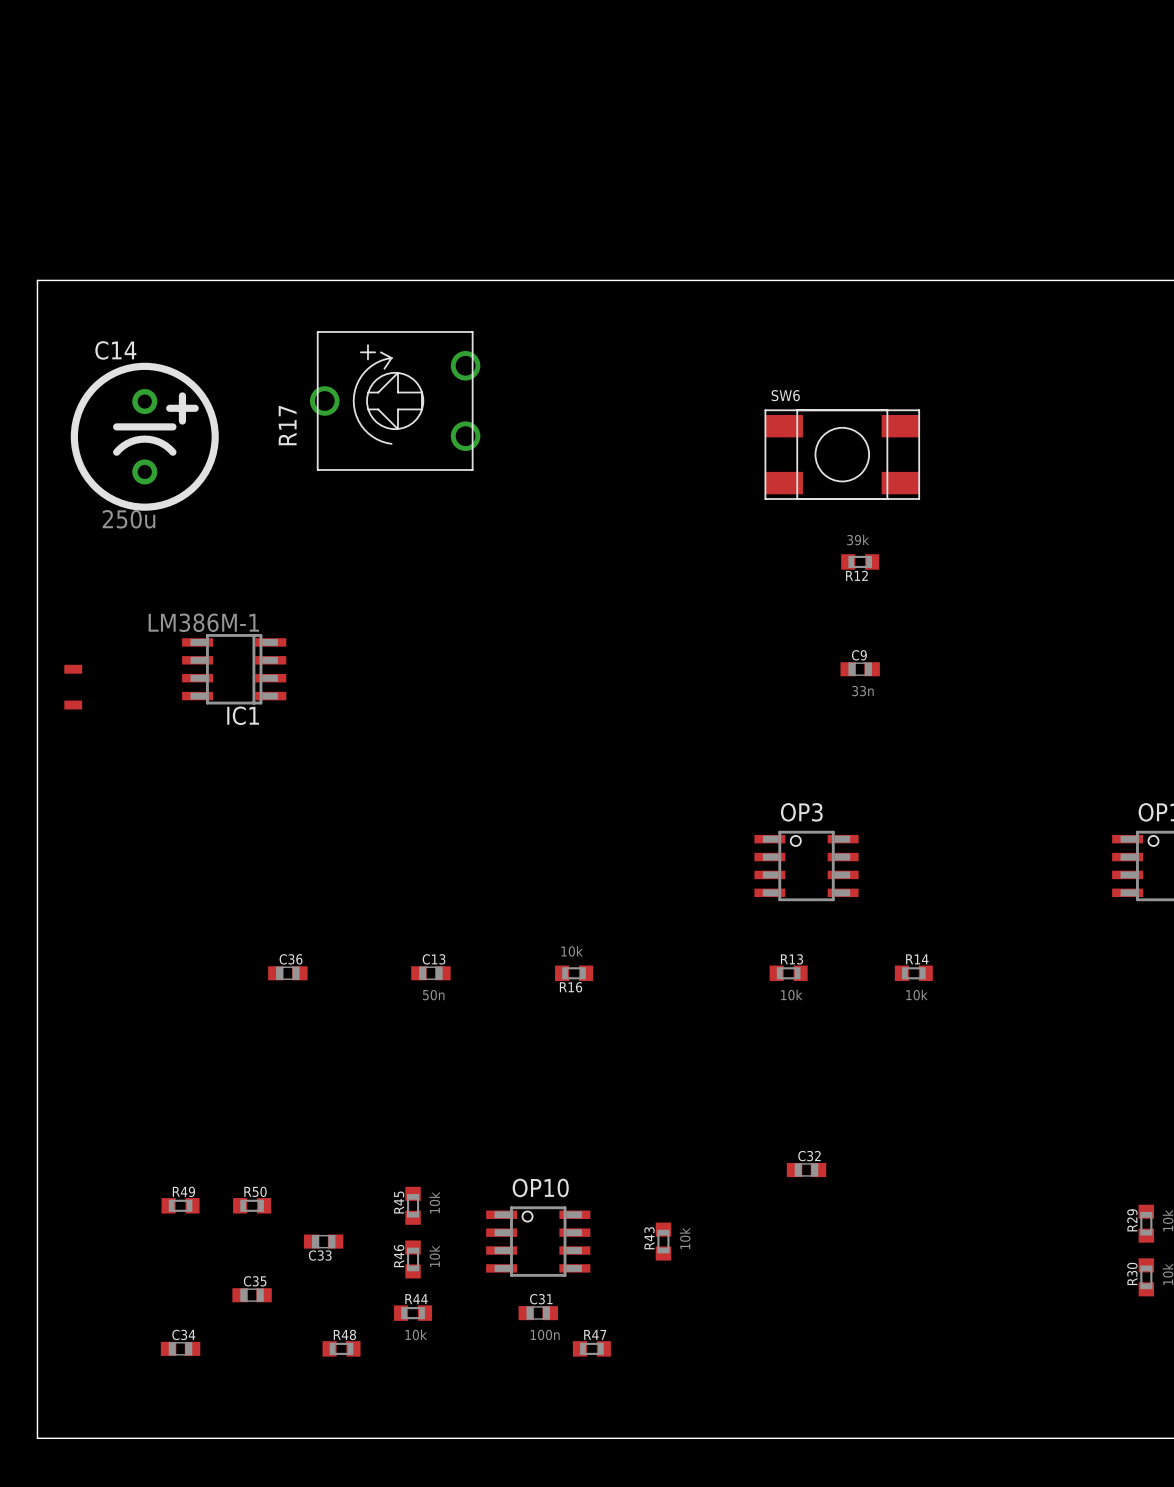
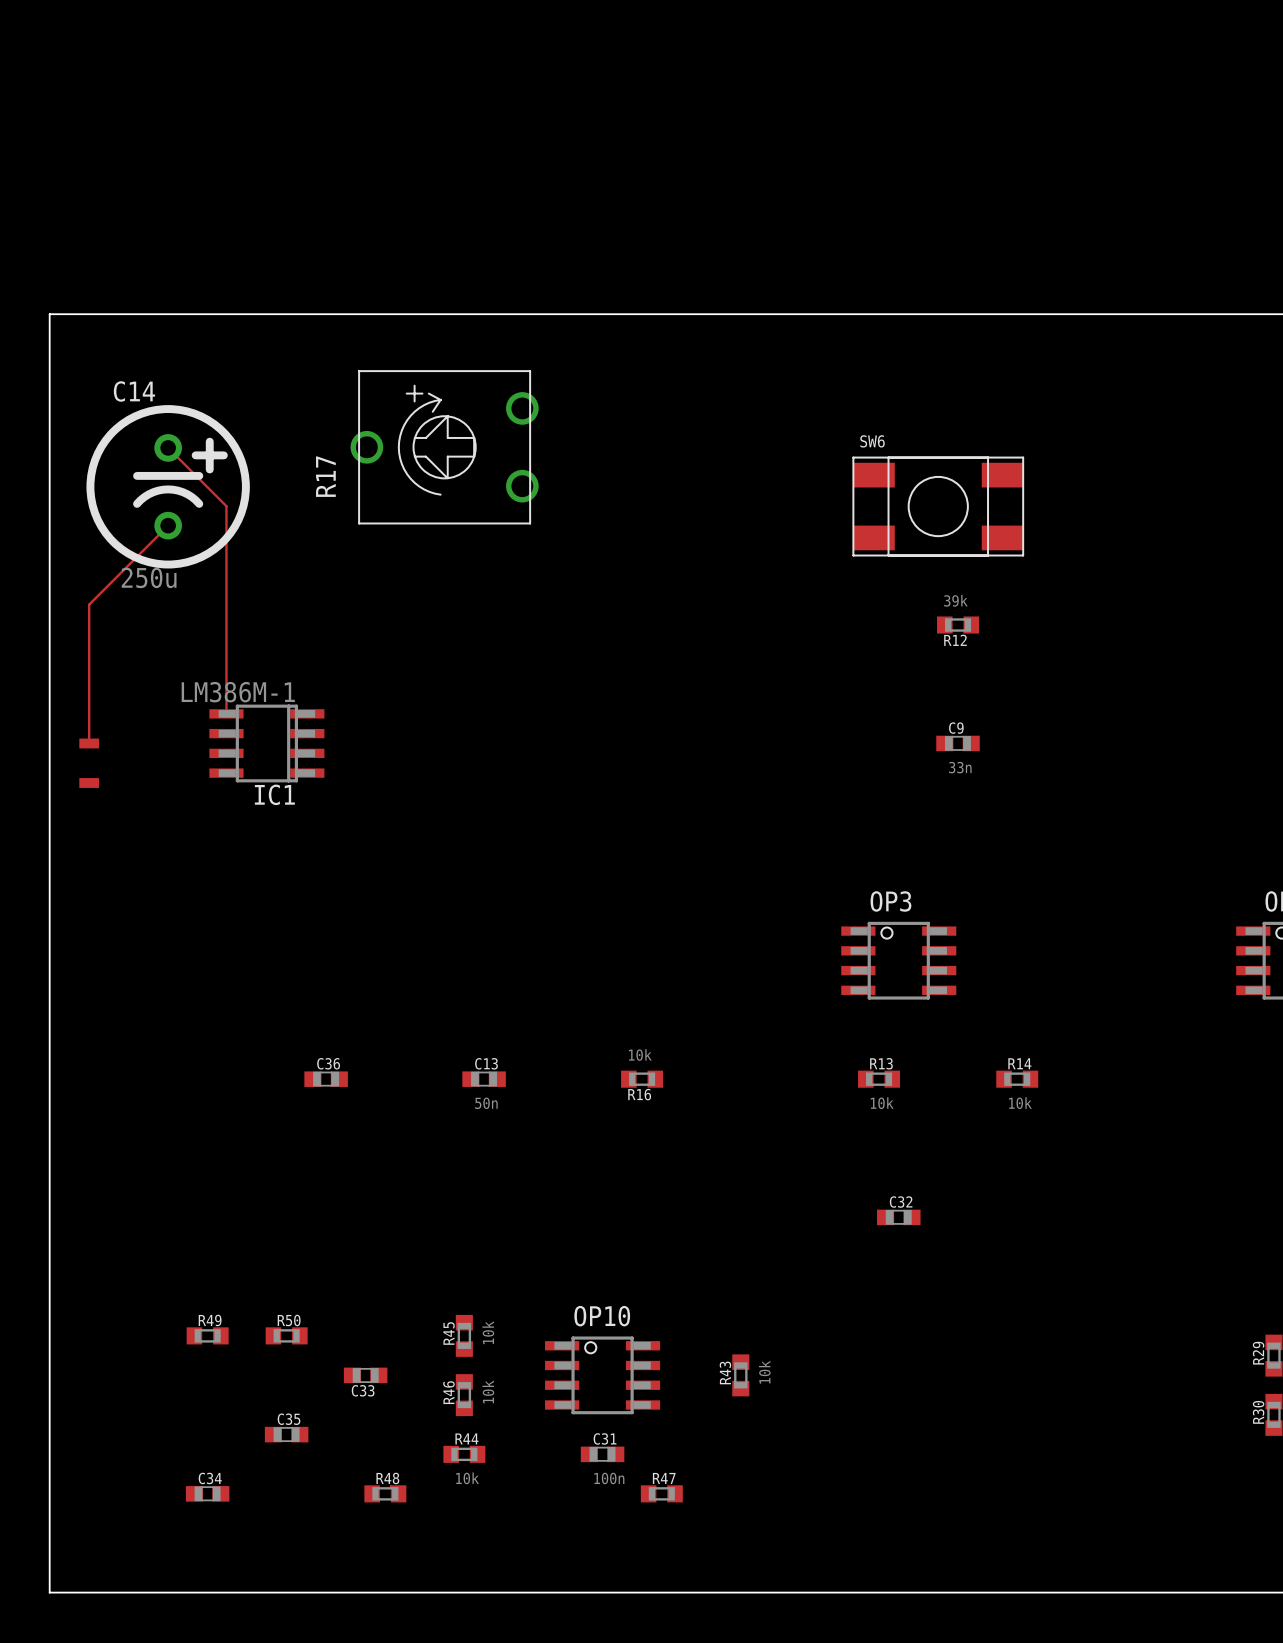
track: none -> (168, 447) (226, 506) (226, 713)
track: none -> (168, 525) (89, 604) (89, 743)
C32 position: (806, 1170) -> (898, 1217)

